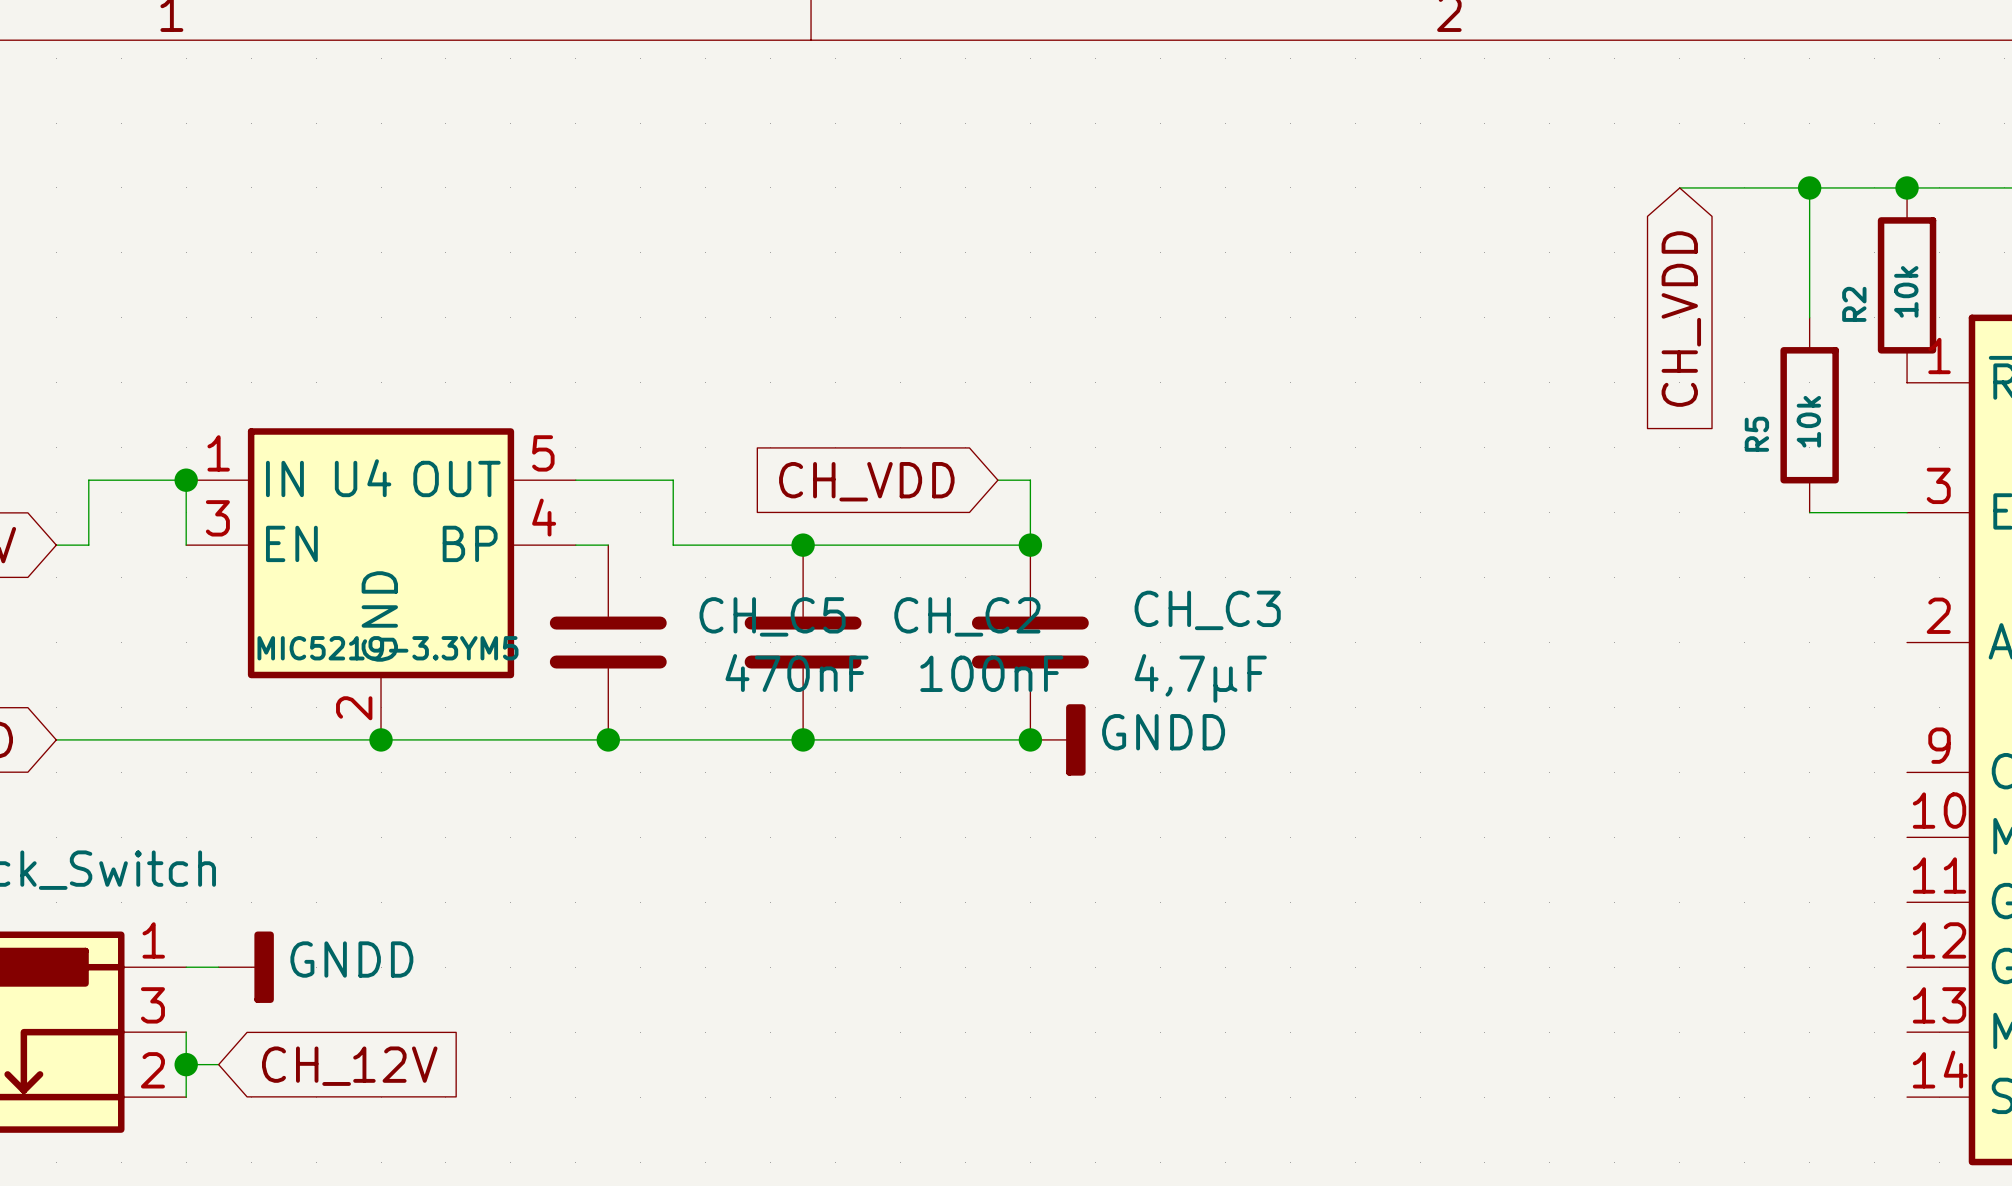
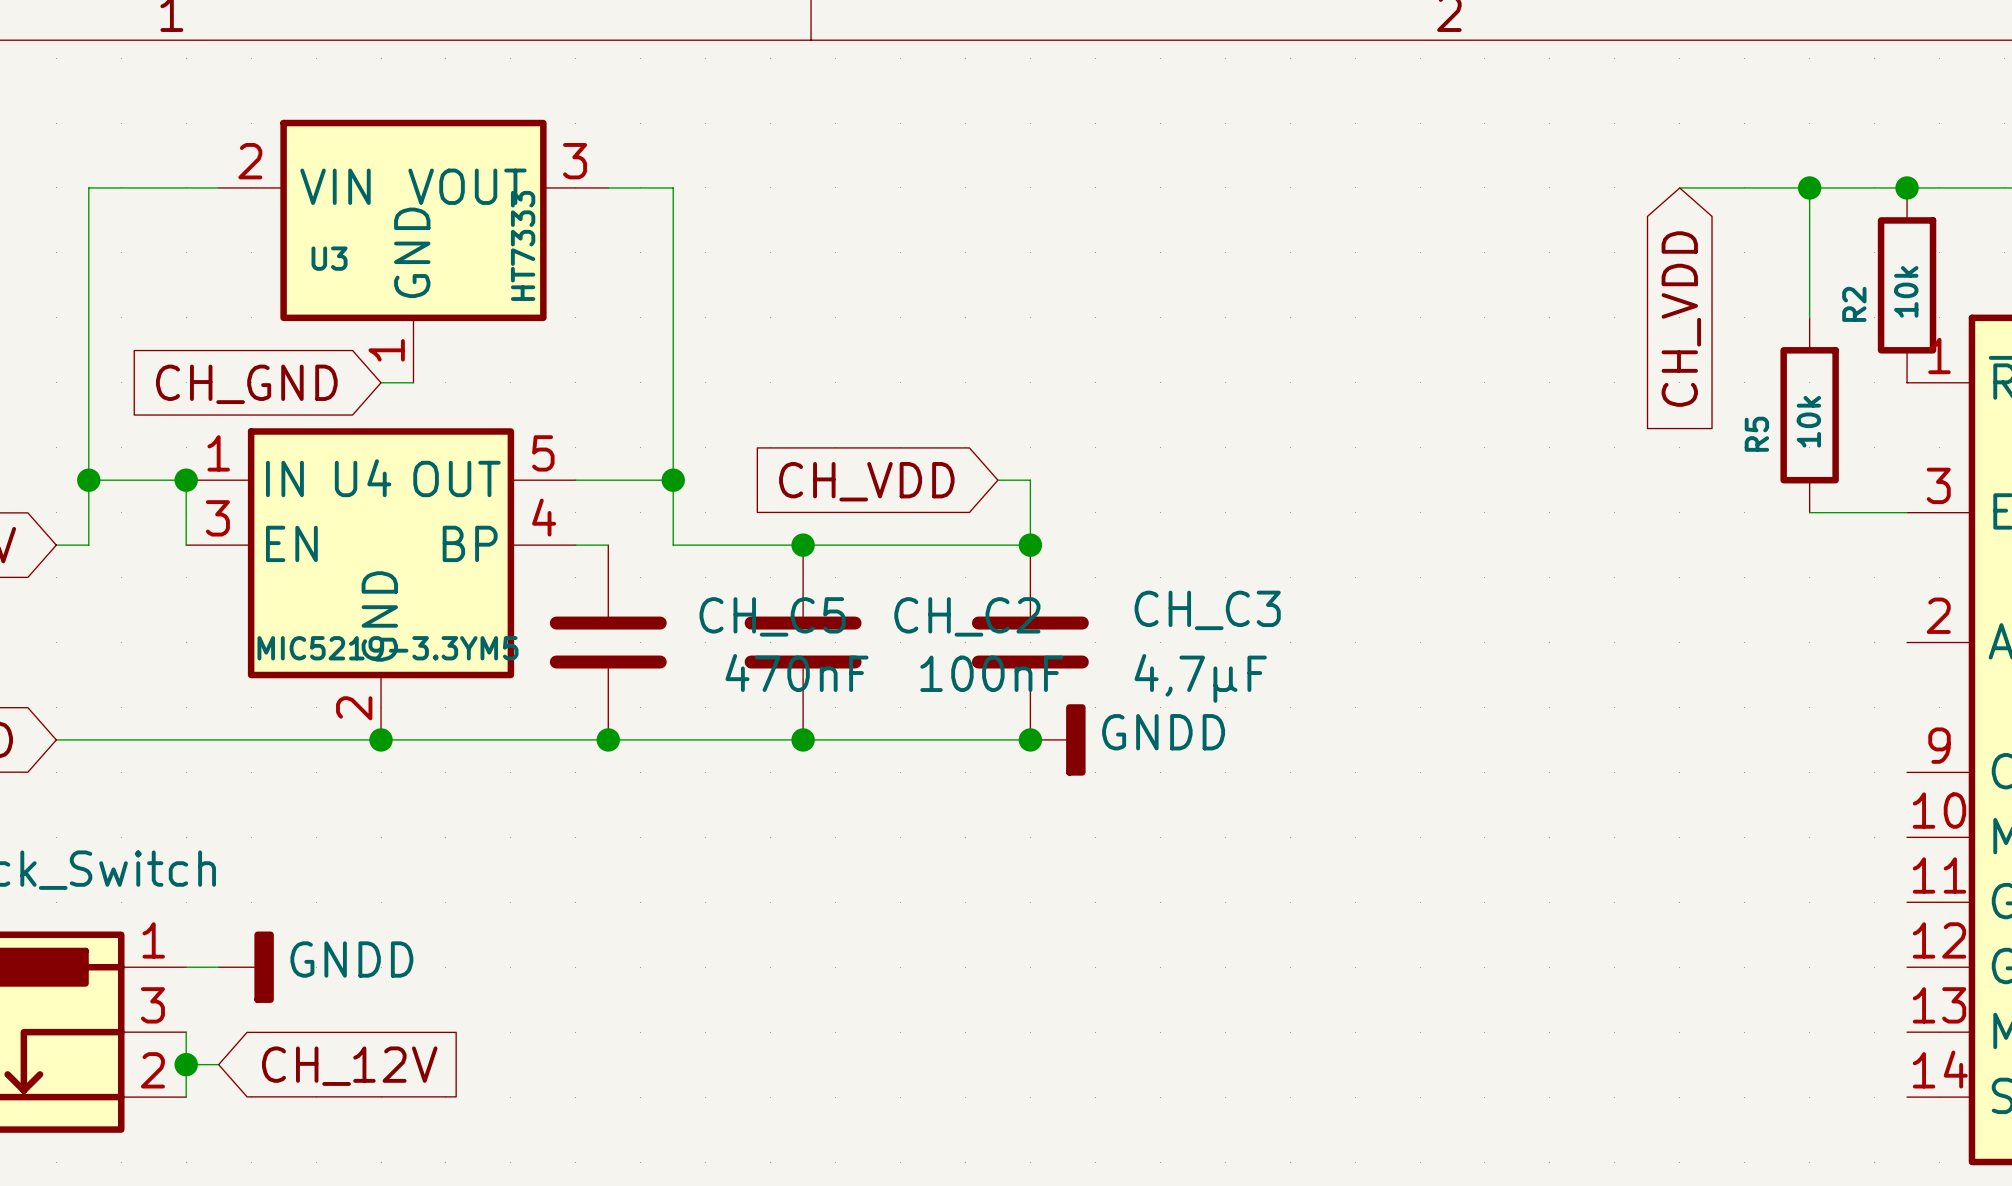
wire: none -> (218, 187) (88, 187) (88, 480)
wire: none -> (608, 187) (673, 187) (673, 480)
U3: none -> HT7333 (413, 251)
wire: none -> (381, 382) (413, 382)
global label: none -> CH_GND (246, 384)
junction: none -> (88, 480)
junction: none -> (673, 480)

